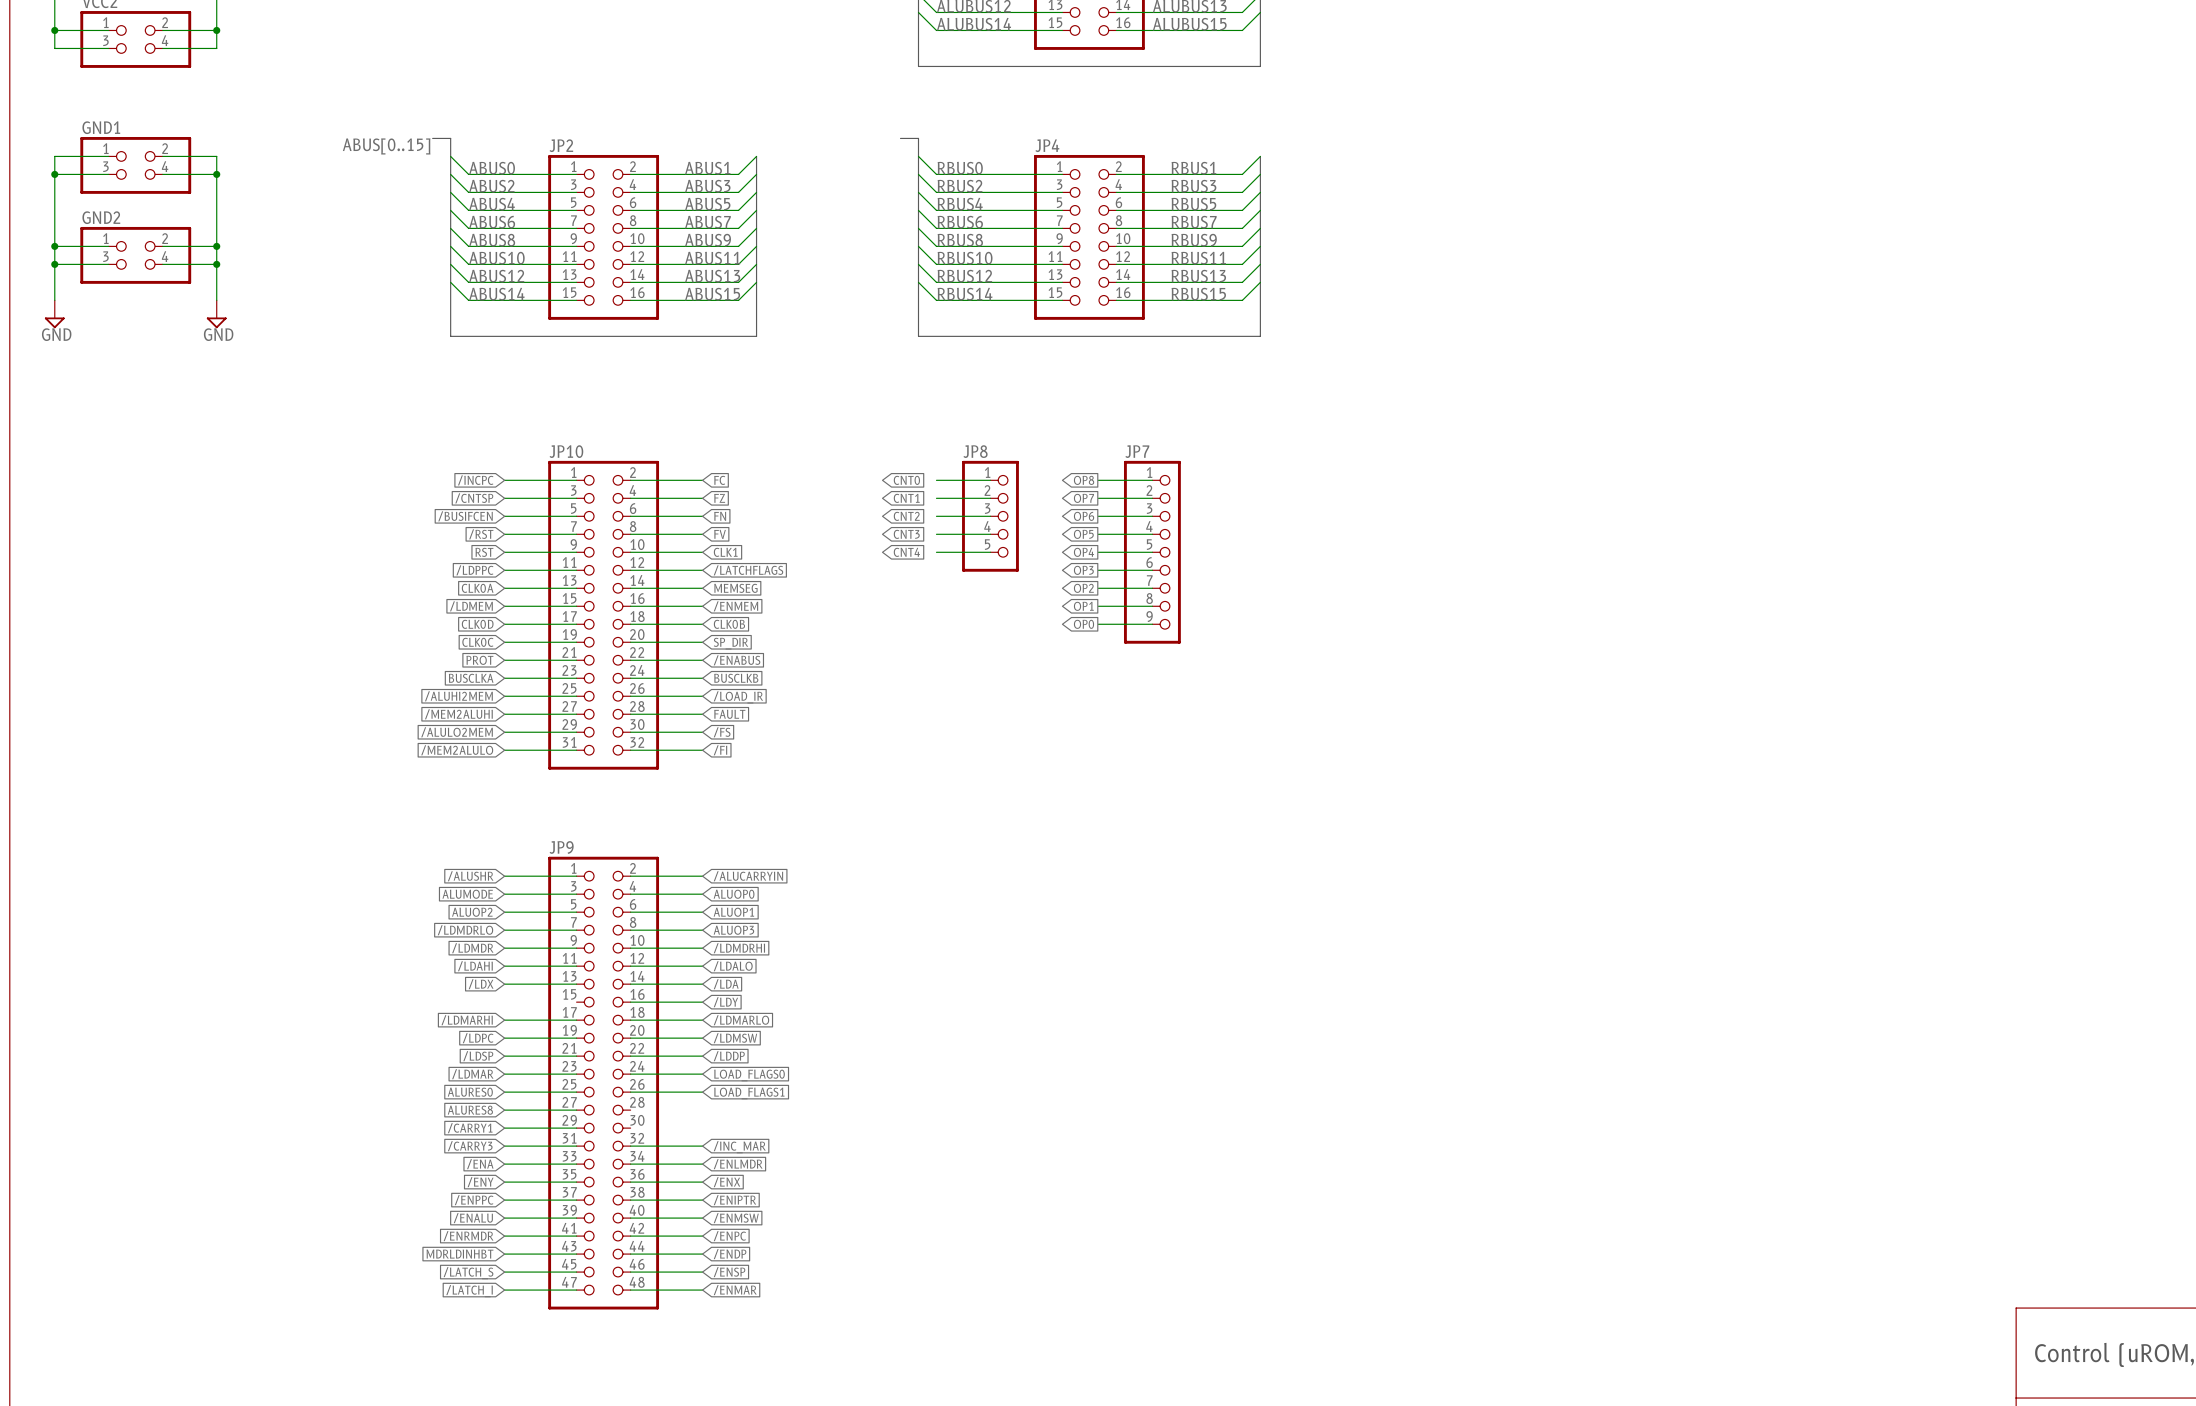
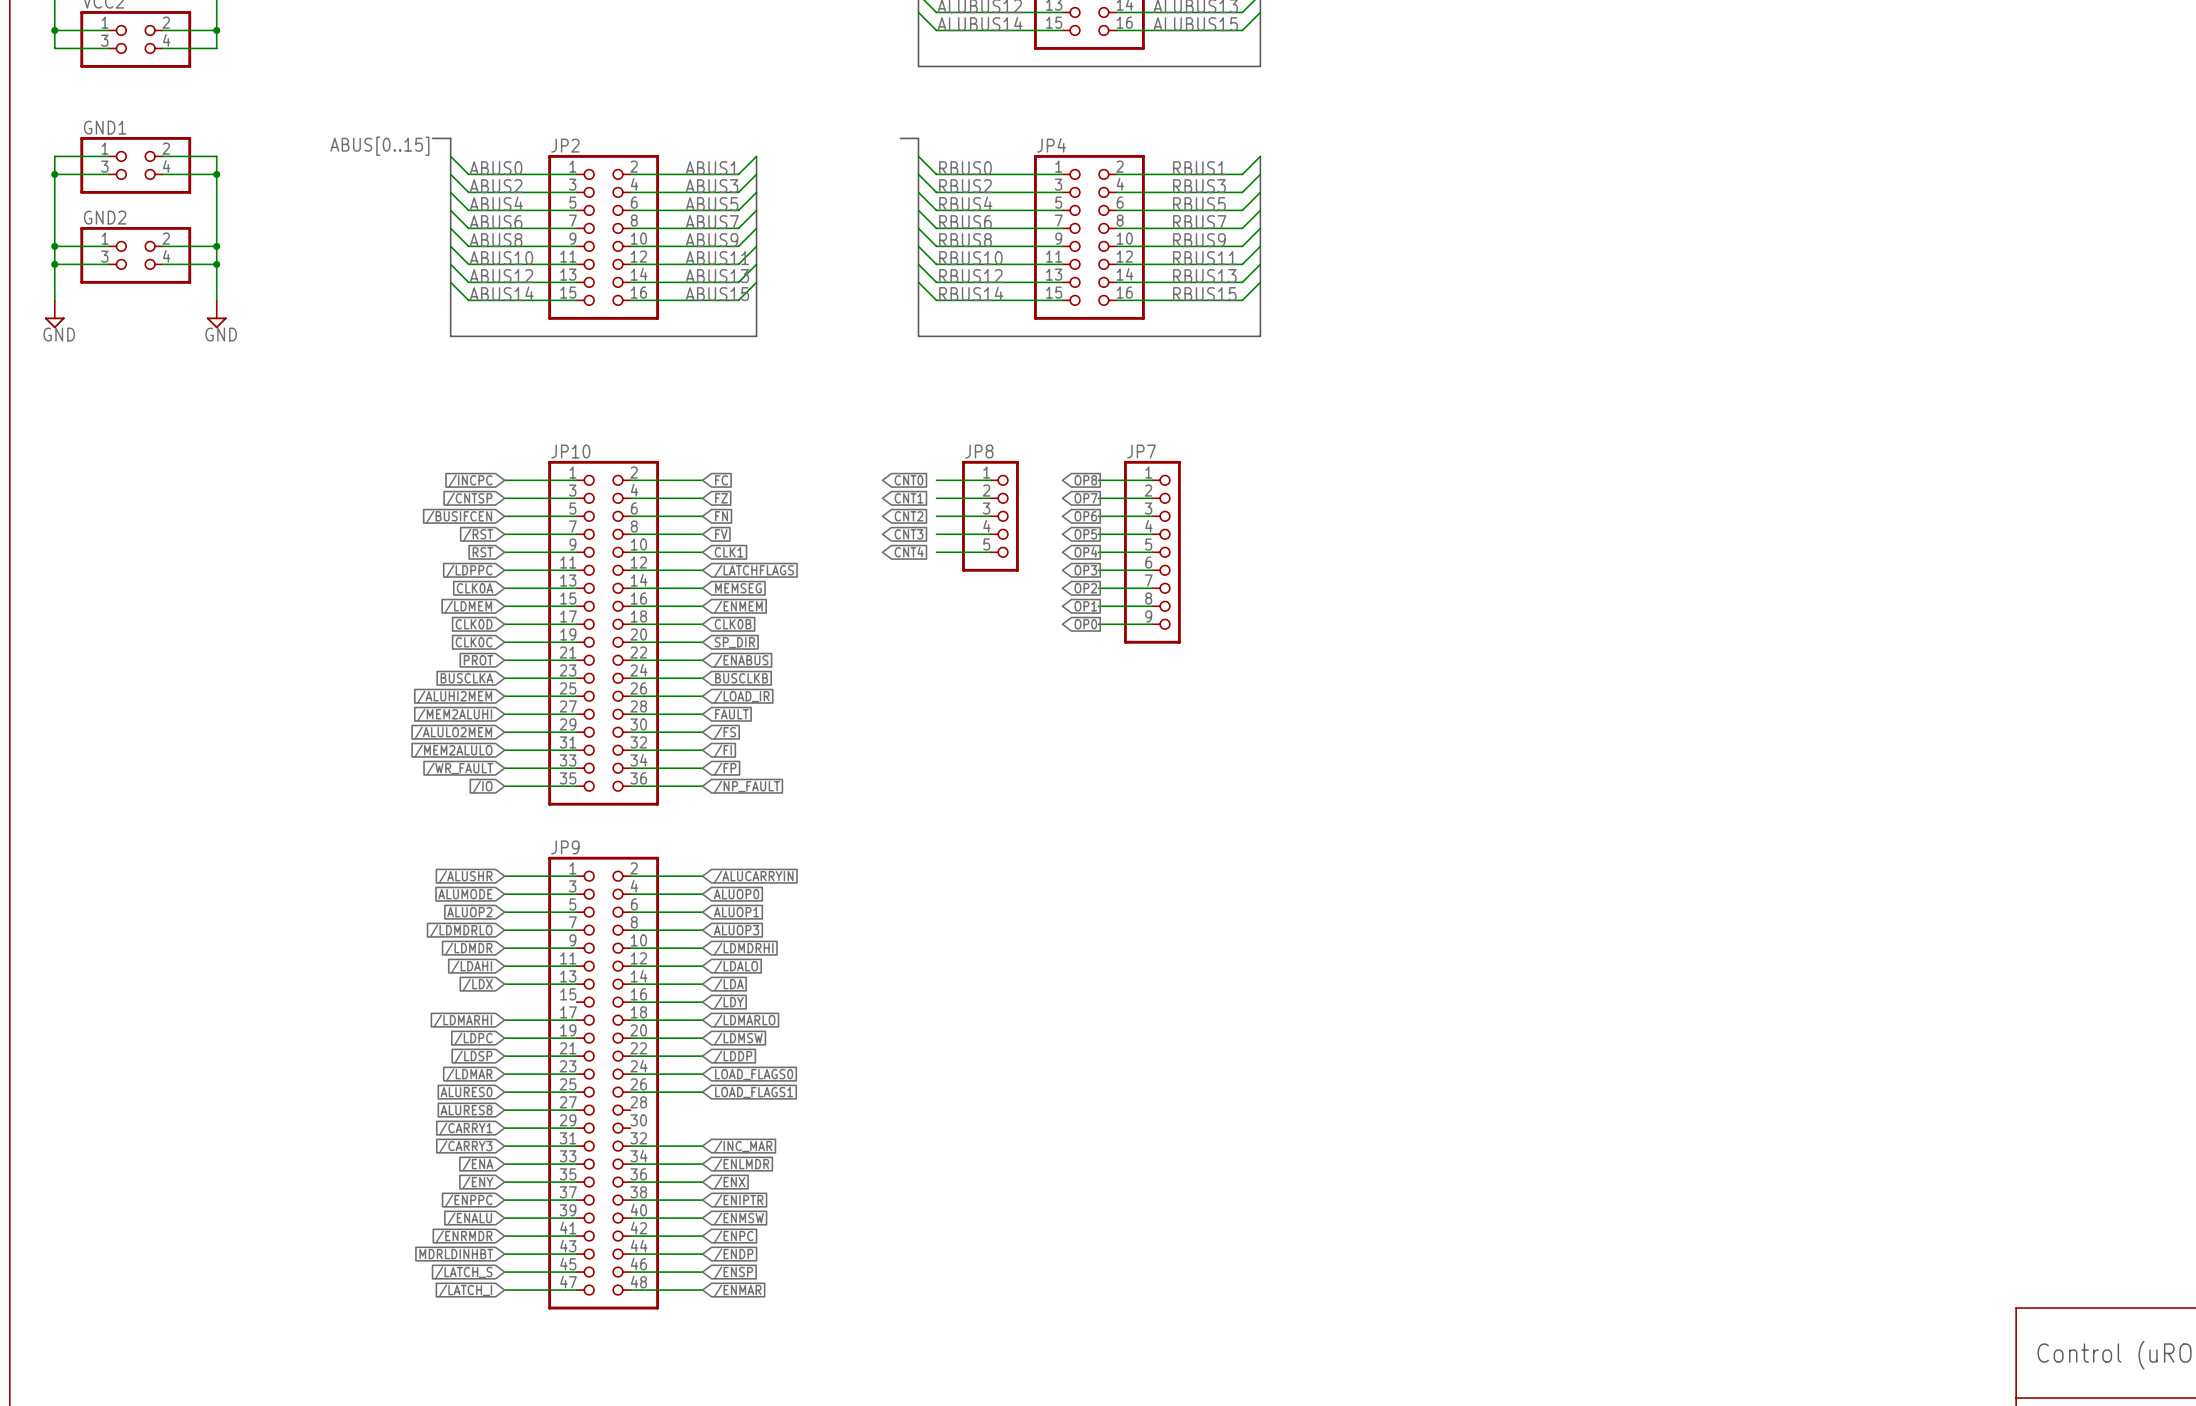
JP10 symbol: [548, 460, 660, 770] -> [548, 460, 660, 806]
wire: none -> (504, 768) (576, 768)
wire: none -> (630, 768) (702, 768)
global label: none -> /FP (725, 769)
global label: none -> /WR_FAULT (459, 769)
global label: none -> /IO (482, 787)
wire: none -> (504, 786) (576, 786)
wire: none -> (630, 786) (702, 786)
global label: none -> /NP_FAULT (747, 787)

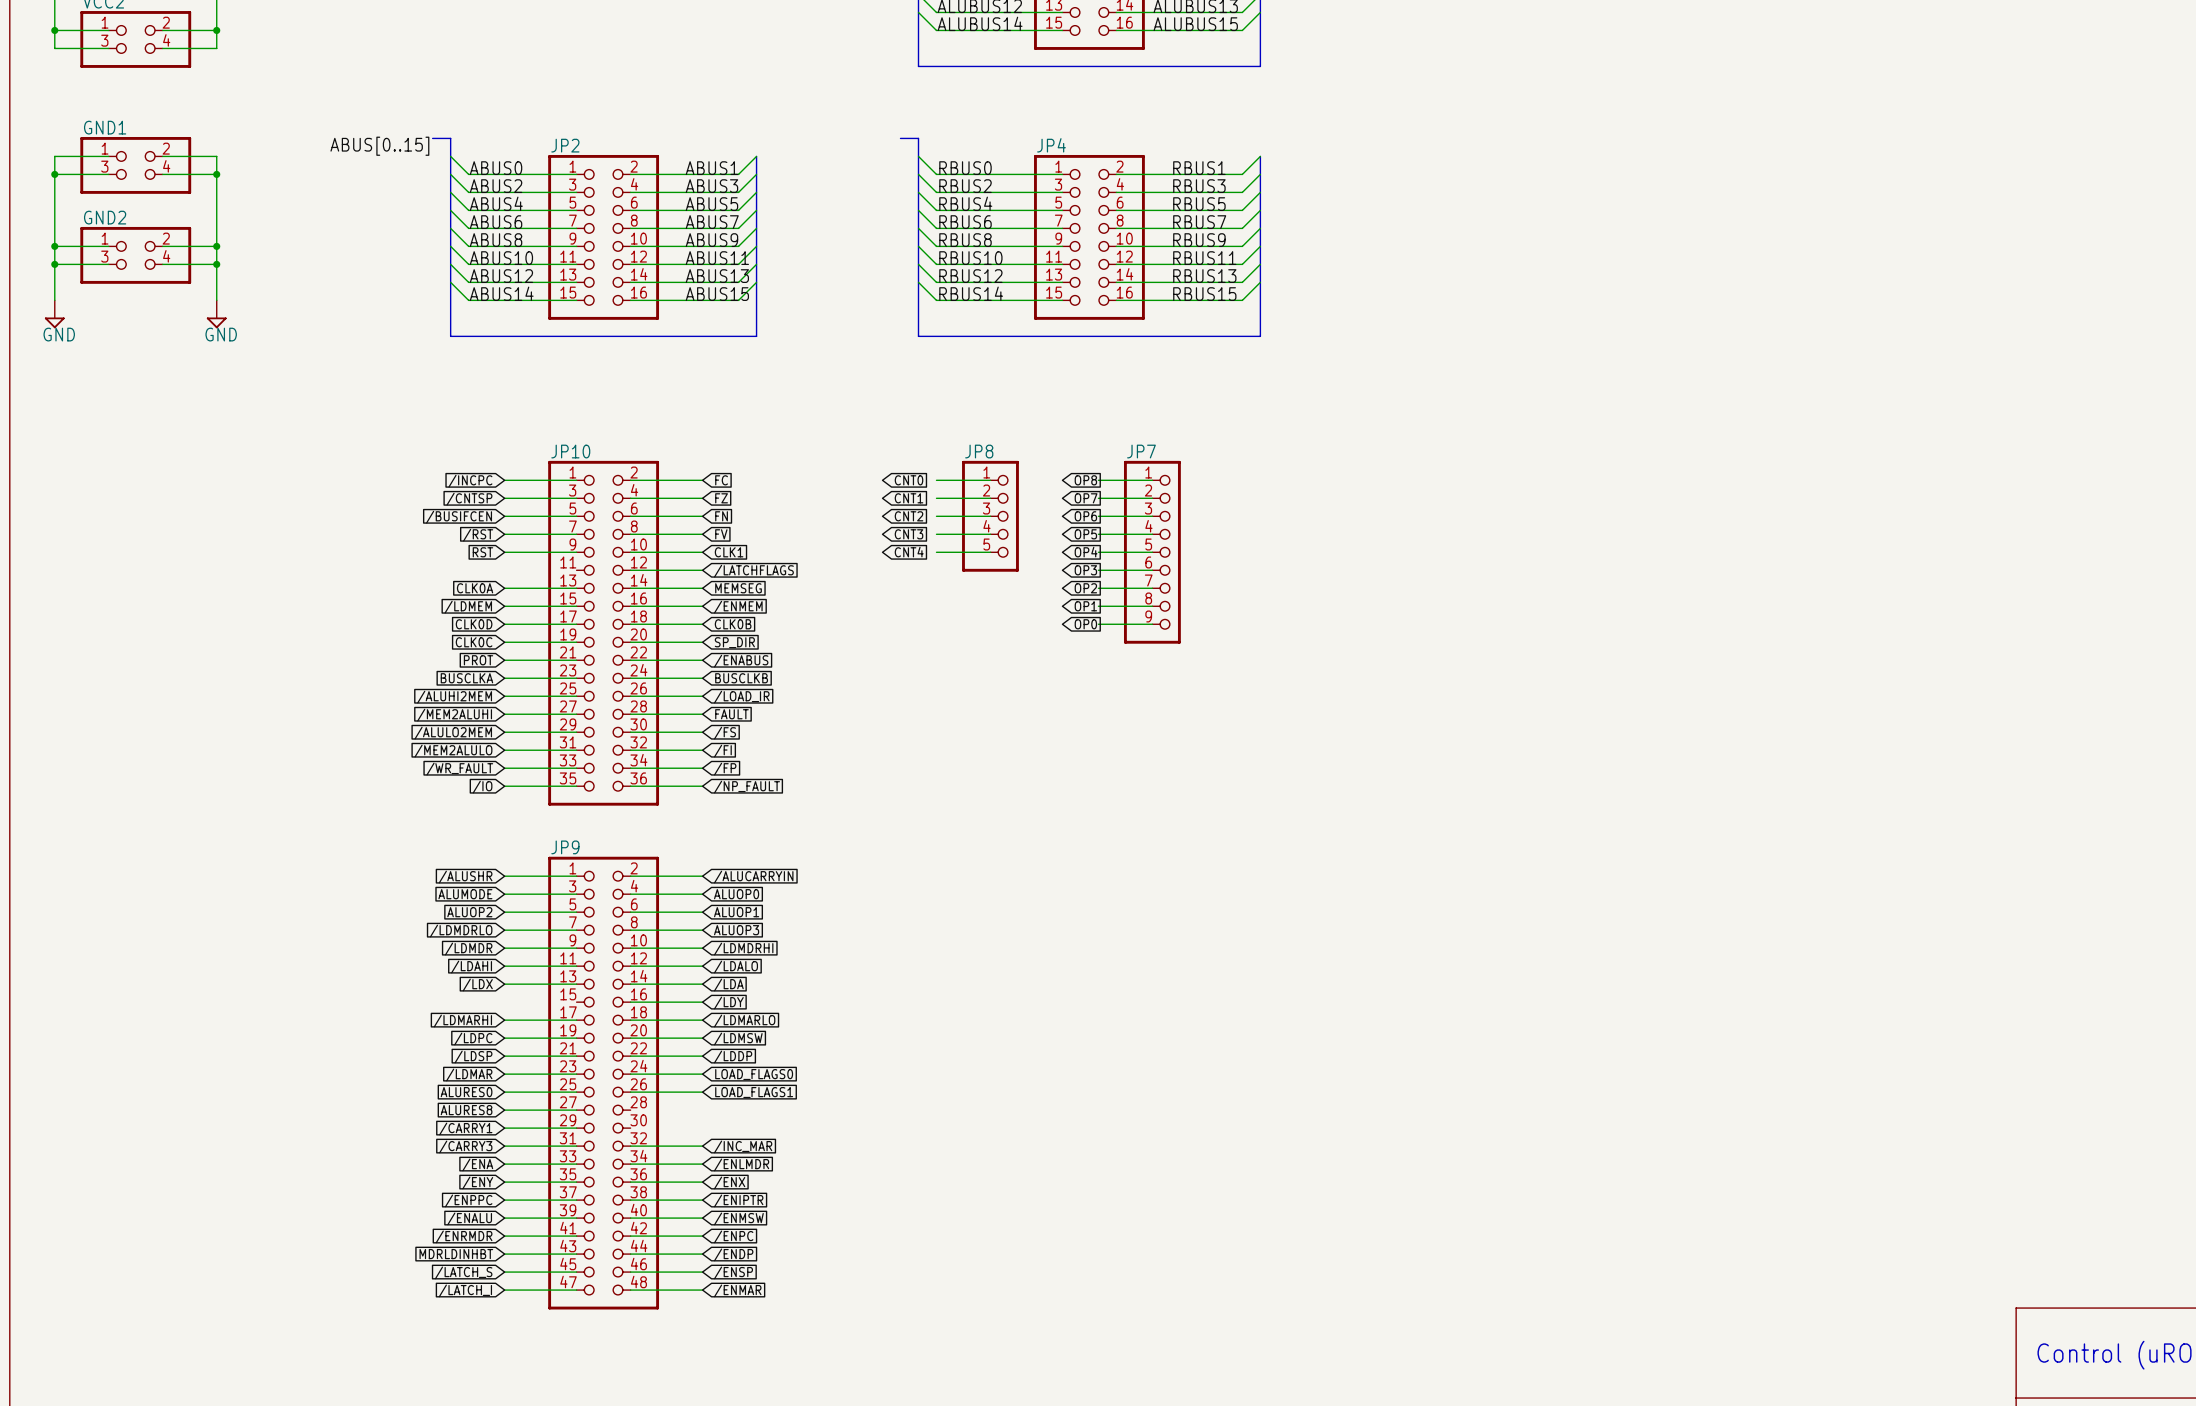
wire: (504, 570) (576, 570) -> none
global label: /LDPPC (469, 571) -> none

